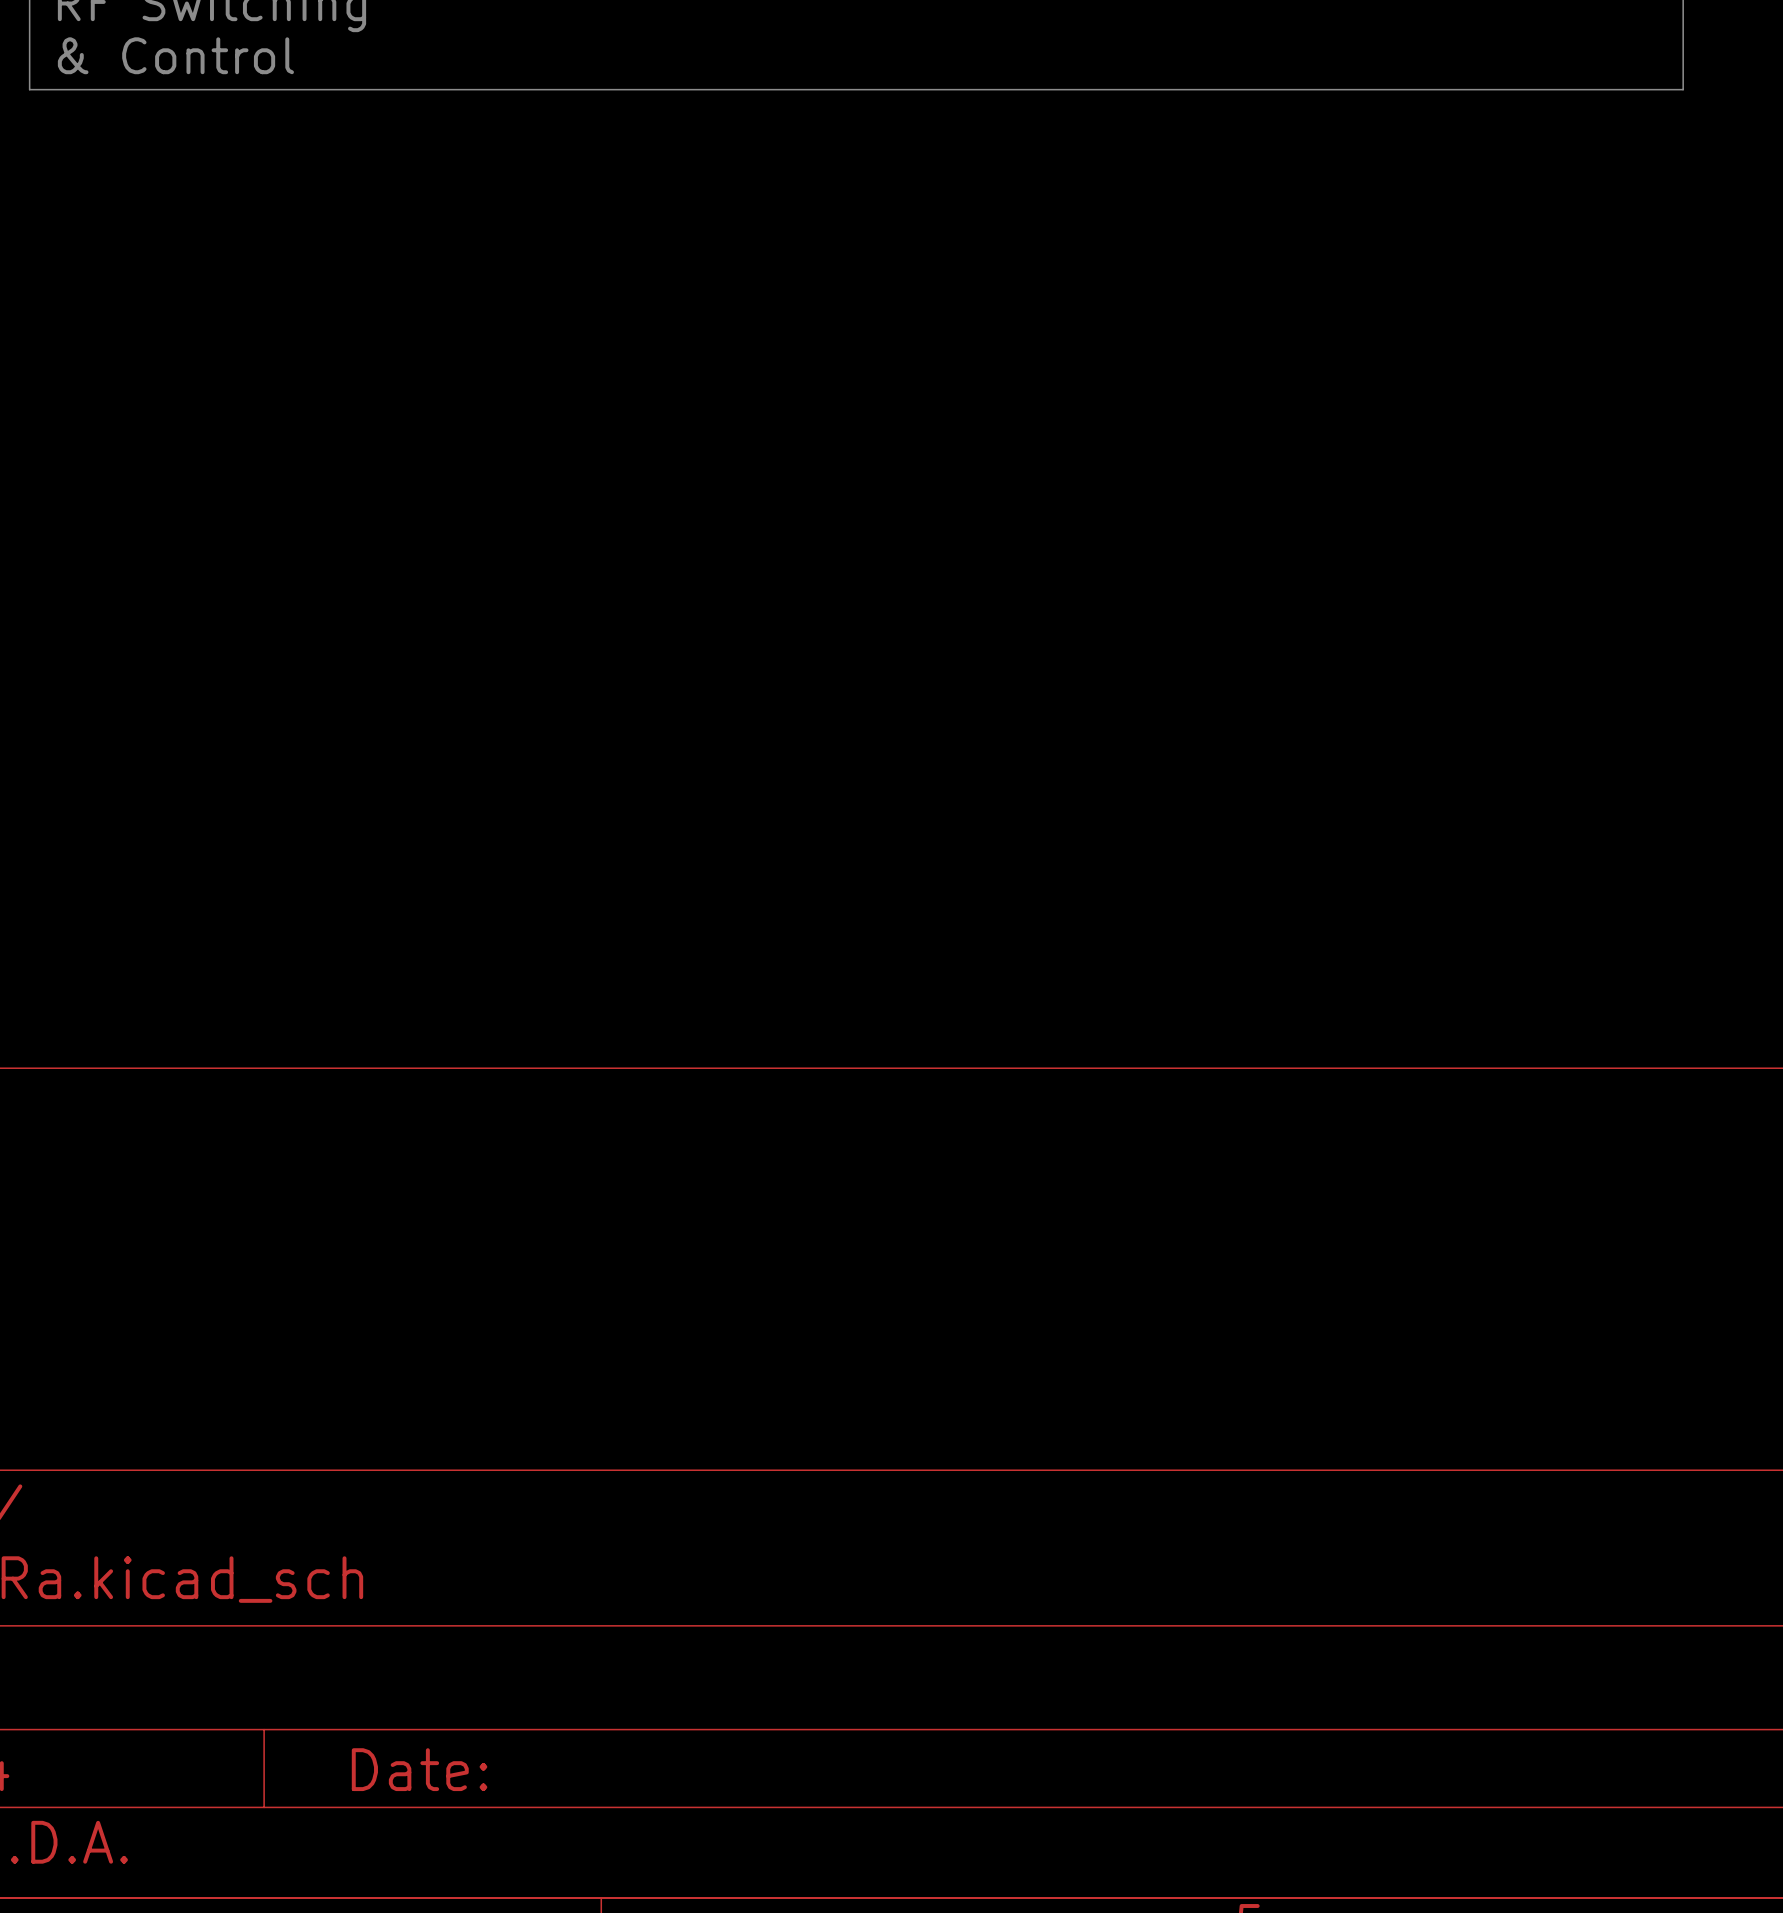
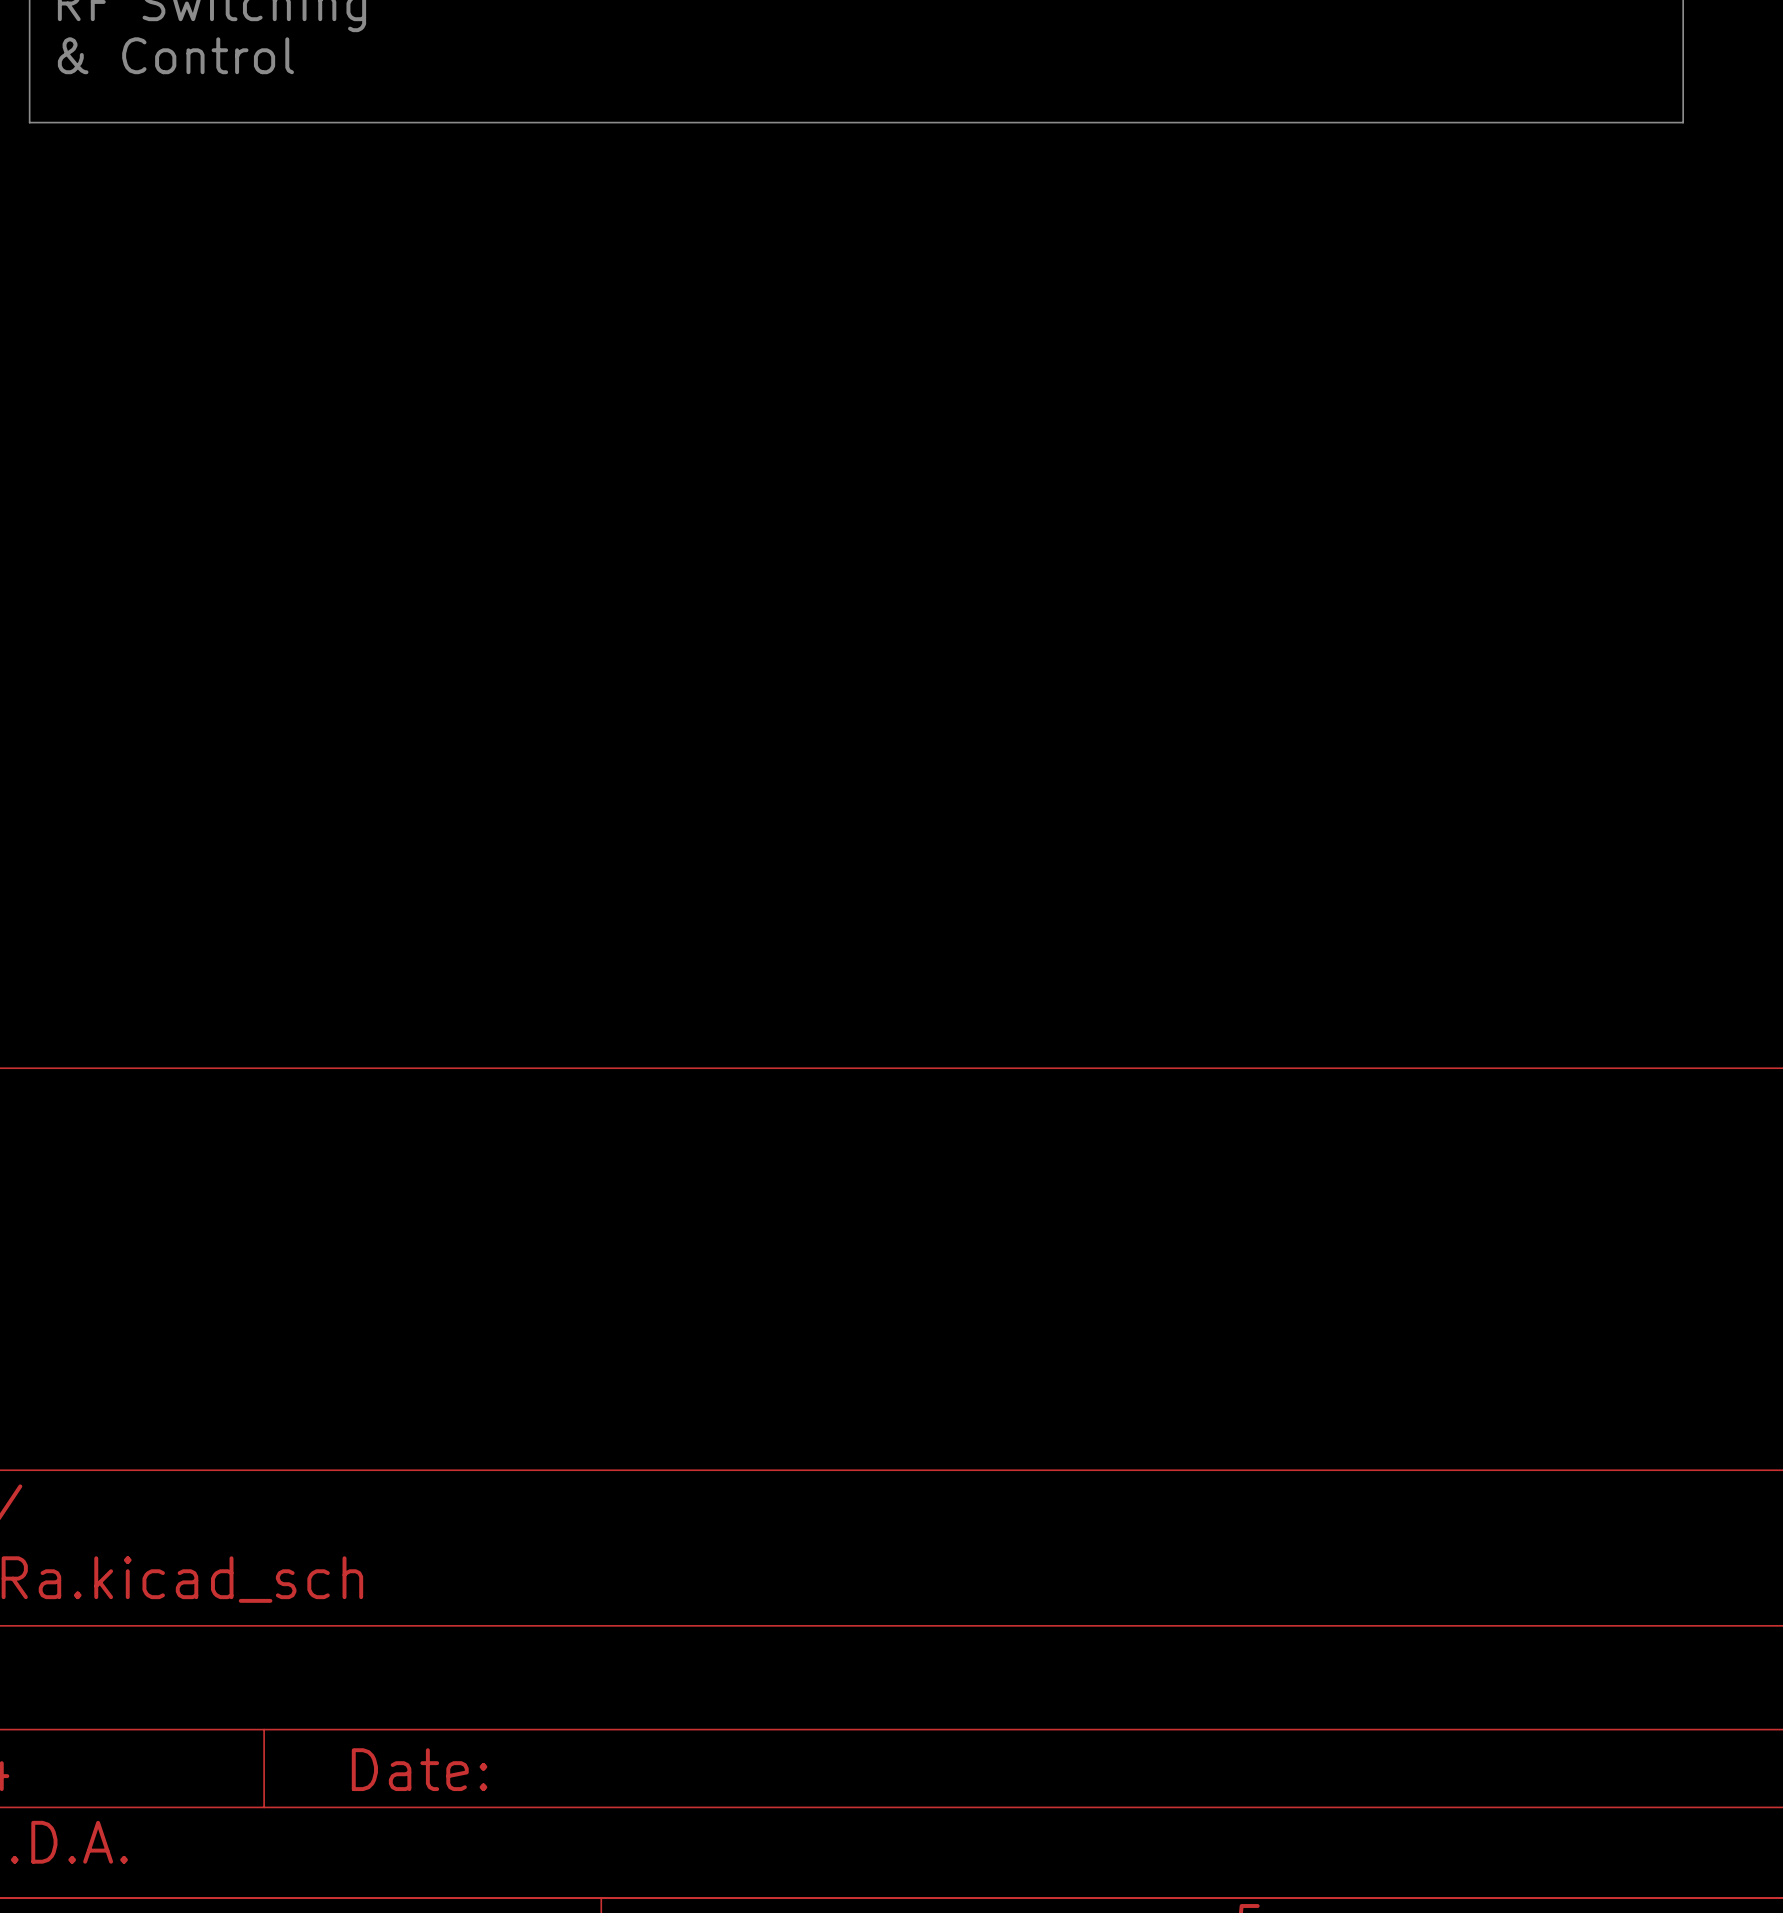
line: (29, 89) (1683, 89) -> (29, 89) (29, 122) (1683, 122) (1683, 89)

